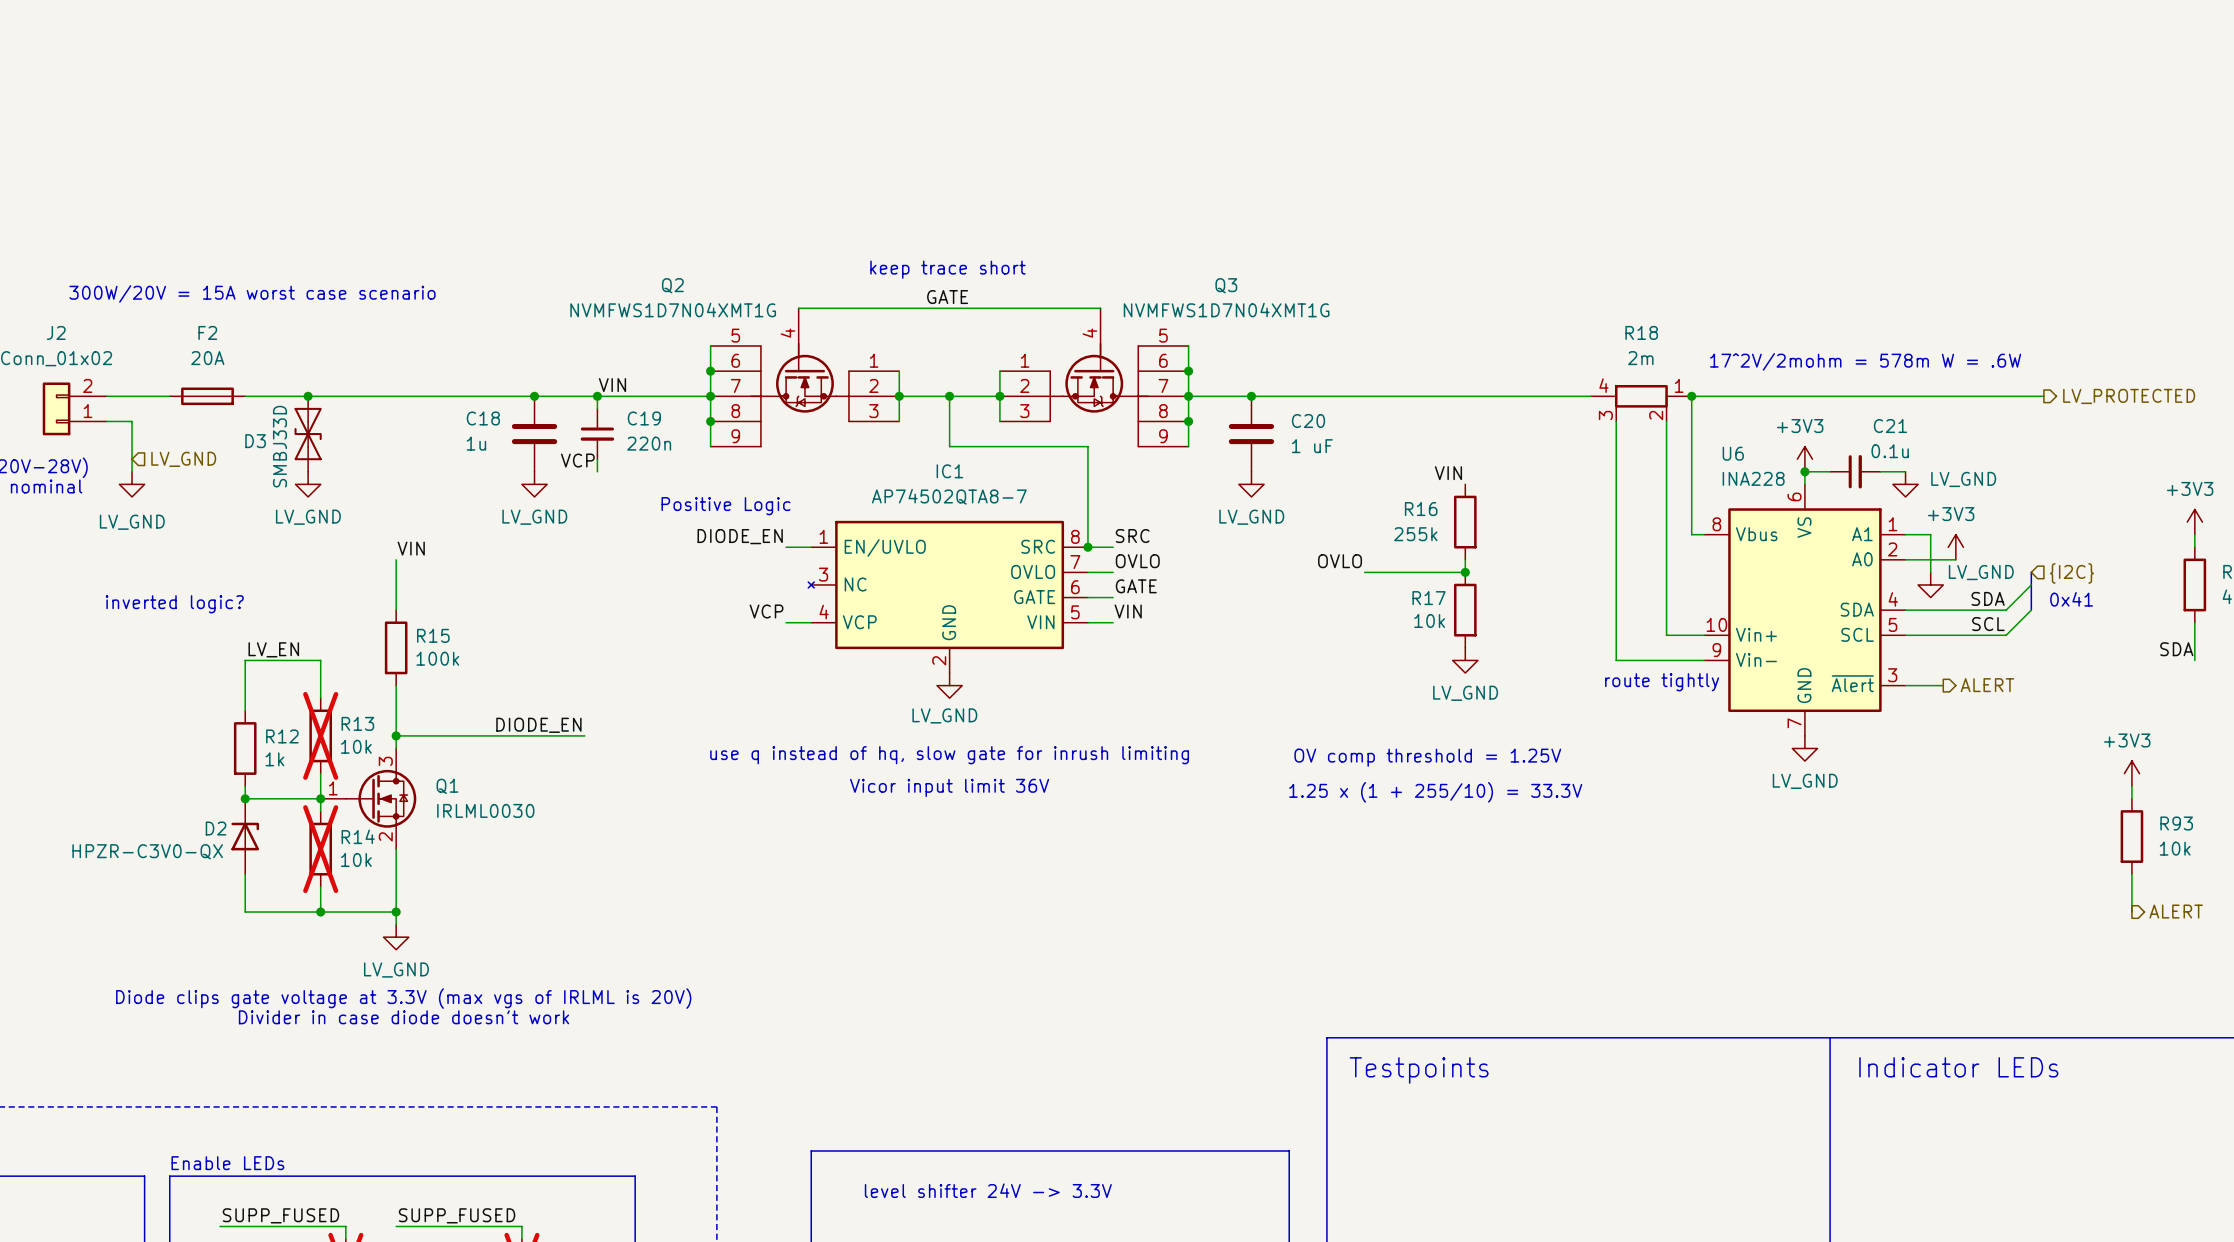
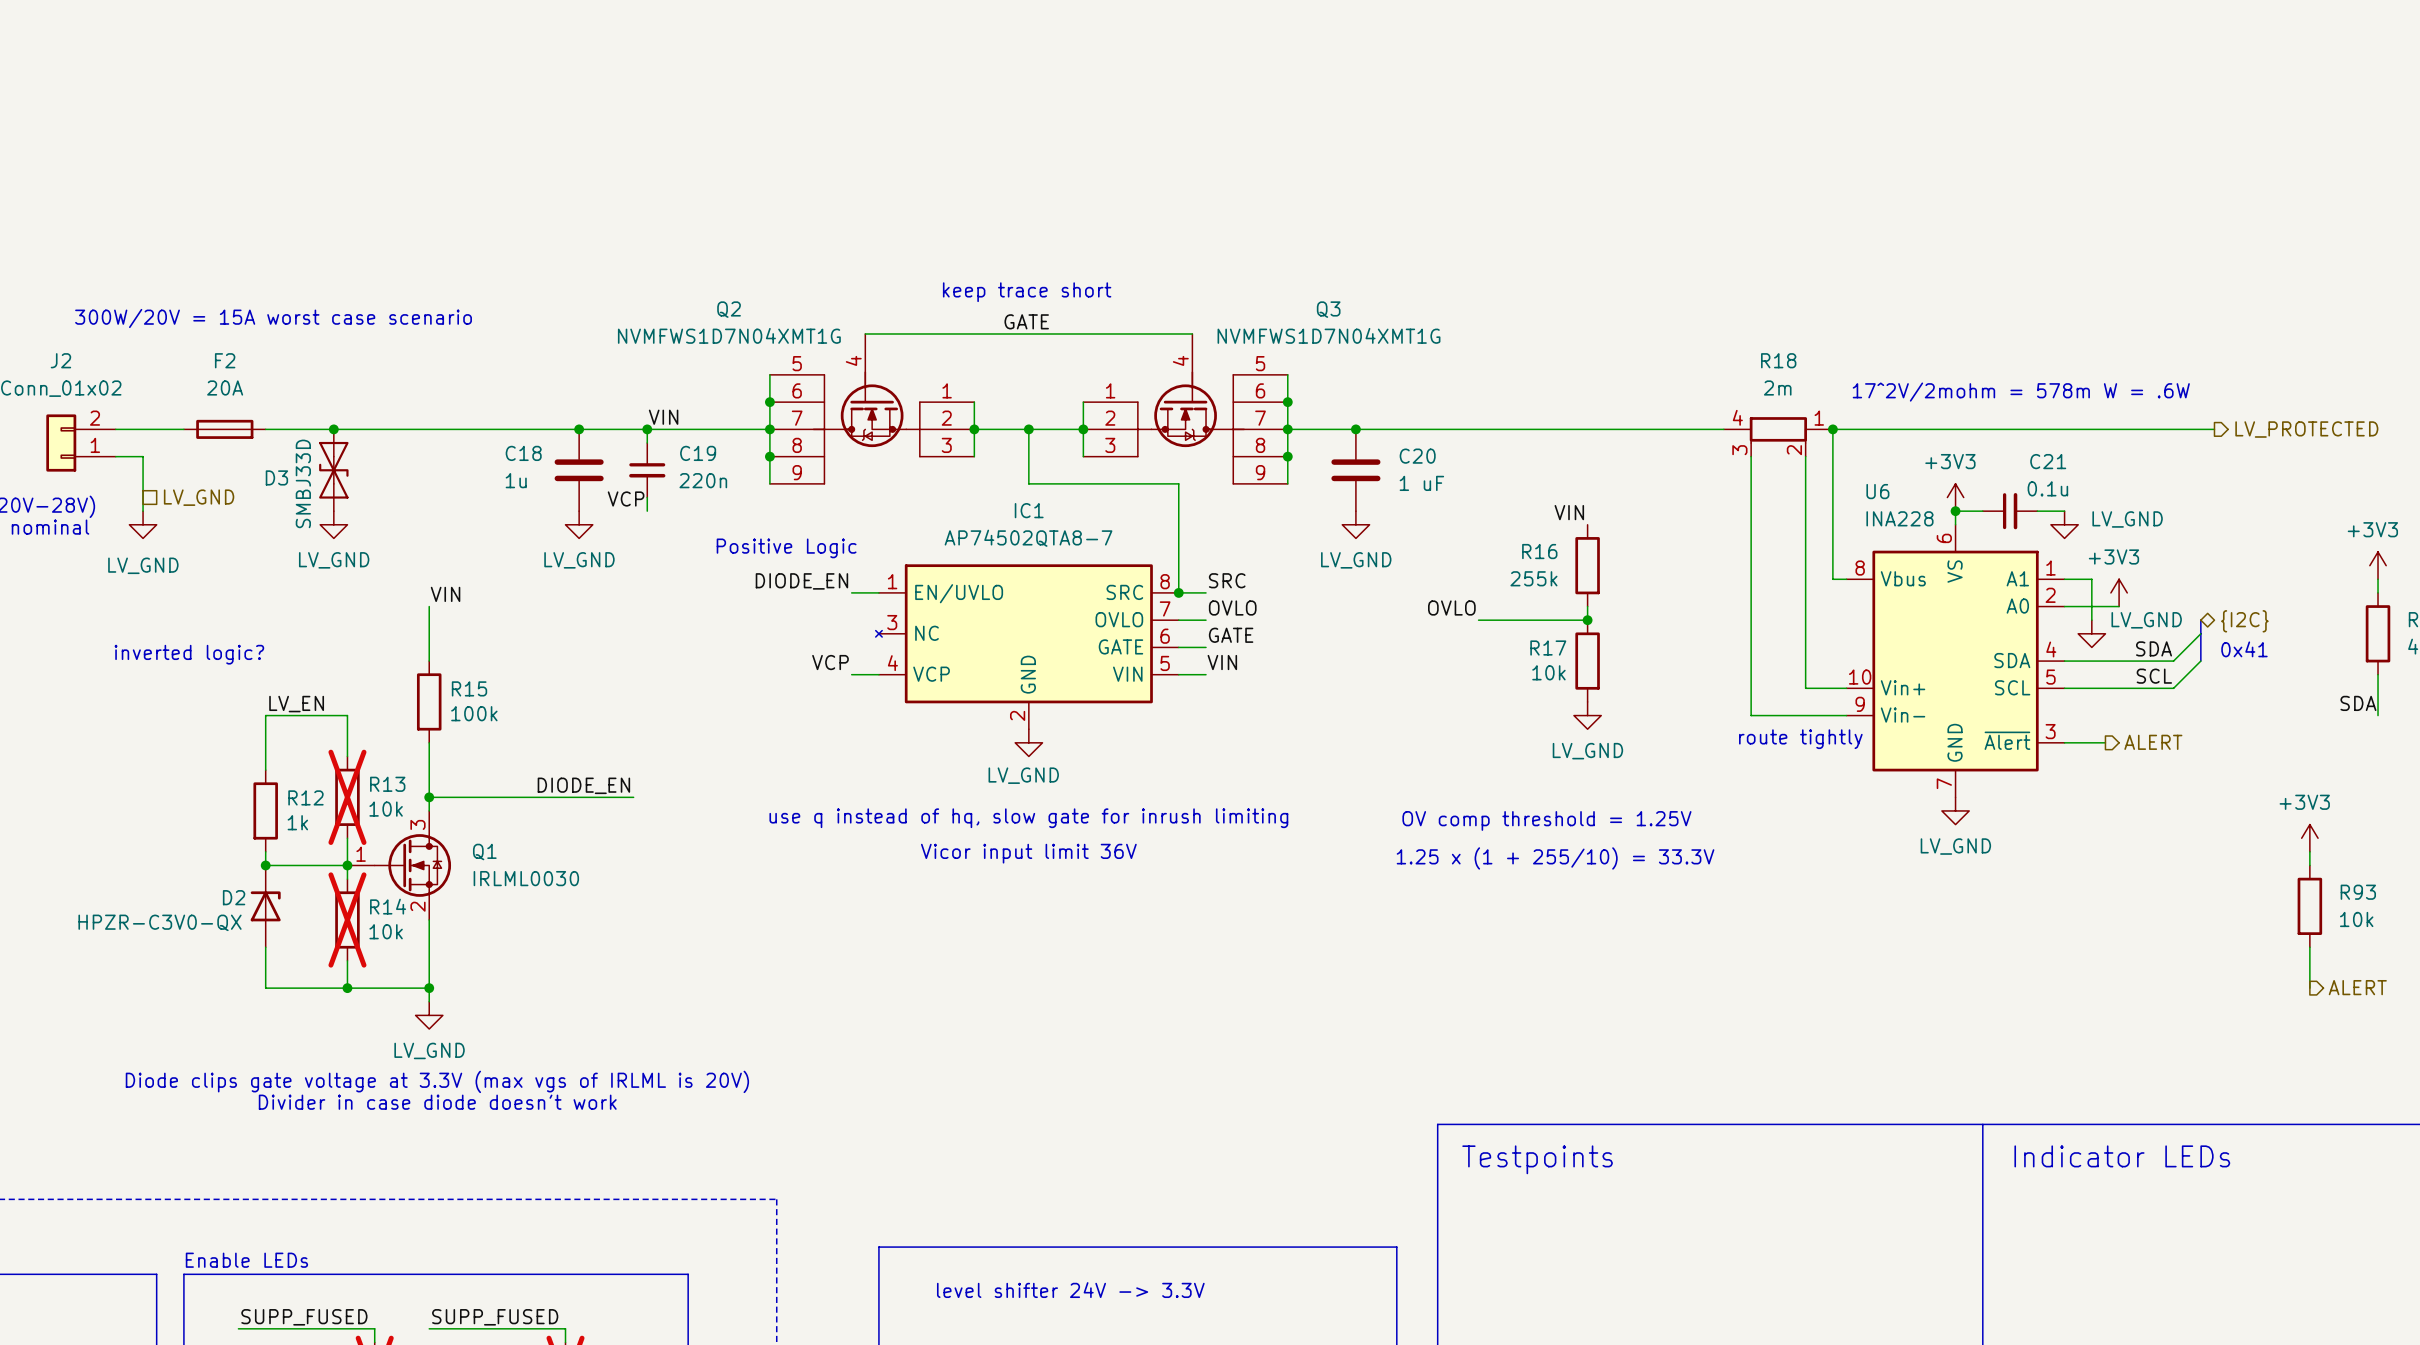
hierarchical label shape: input (183, 459) -> passive (199, 497)
hierarchical label shape: input (2071, 573) -> bidirectional (2244, 621)

